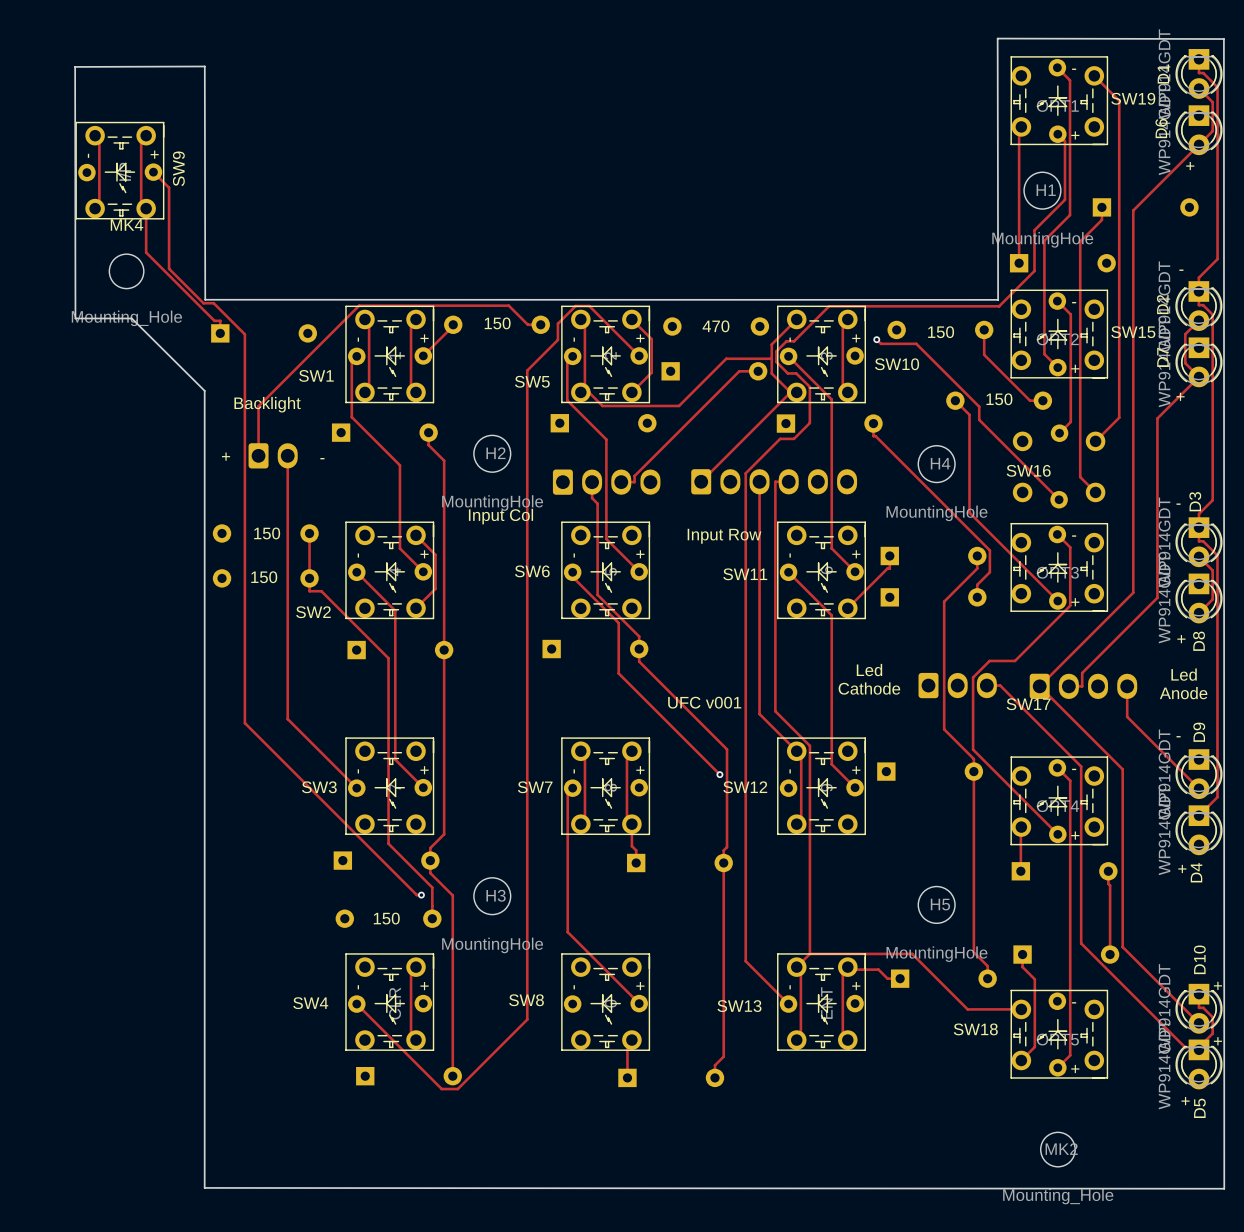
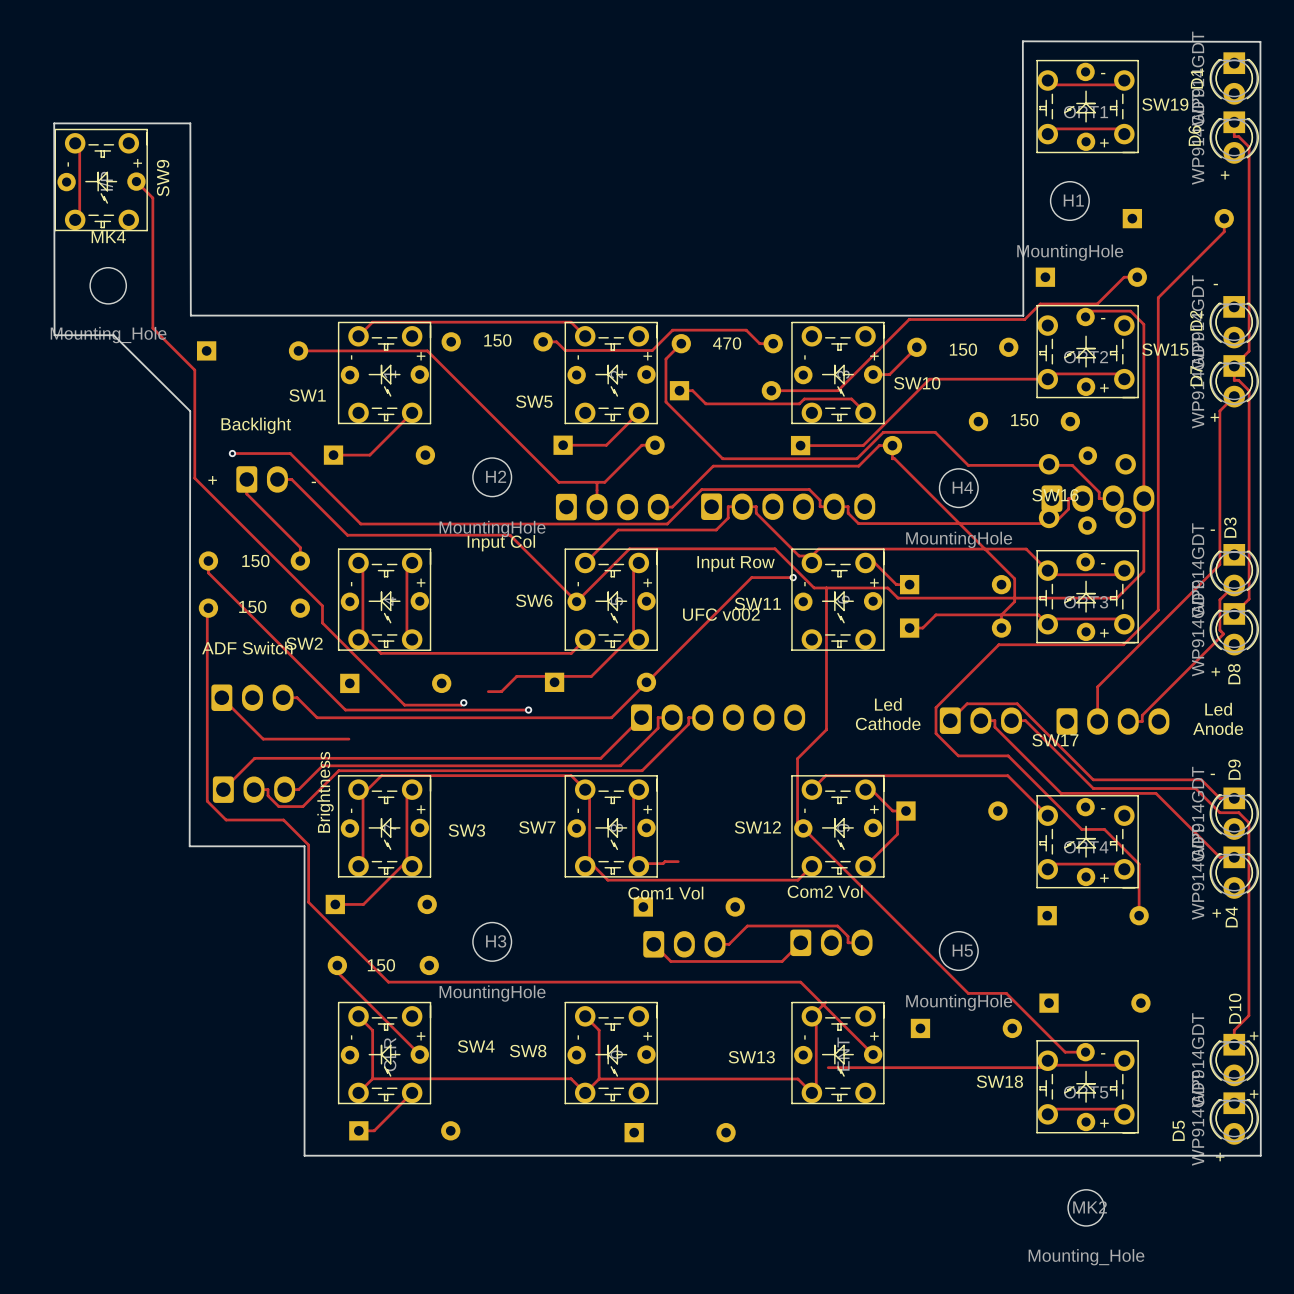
board edge: (1223, 39) (1224, 1188) (204, 1187) (204, 390) -> (1260, 41) (1260, 1155) (304, 1155) (304, 846) (189, 846) (190, 411)
track: (1198, 59) (1198, 73) (1203, 73) (1217, 87) (1217, 259) (1198, 277) (1198, 305) (1203, 305) (1212, 314) (1212, 500) (1198, 513) (1198, 541) (1203, 541) (1217, 555) (1217, 797) (1198, 815) -> (980, 720) (994, 720) (994, 727) (1061, 793) (1156, 793) (1219, 857) (1234, 857)
track: (1057, 67) (1070, 80) (1070, 215) (1044, 240) (1044, 354) (1057, 367) -> none
track: (1094, 75) (1119, 100) (1119, 417) (1095, 441) -> (1124, 80) (1119, 84) (1052, 84) (1047, 80)
track: (1198, 88) (1212, 102) (1212, 131) (1133, 210) (1133, 592) (1039, 686) (1122, 769) (1122, 947) (1198, 1023) -> none
track: none -> (1234, 122) (1234, 136) (1238, 136) (1249, 146) (1249, 351) (1234, 365) (1234, 380) (1238, 380) (1249, 390) (1249, 599) (1234, 613)
track: (1021, 126) (1019, 129) (1019, 263) -> (1047, 134) (1052, 128) (1119, 128) (1124, 134)
track: (1057, 134) (1065, 141) (1065, 199) (1034, 230) (1034, 271) (999, 306) (829, 306) (794, 341) (786, 341) (776, 351) (776, 362) (787, 373) (796, 373) (809, 386) (809, 423) (794, 438) (780, 438) (745, 473) (745, 961) (788, 1004) -> none
track: (146, 135) (141, 140) (141, 203) (146, 208) (146, 252) (214, 320) (220, 320) (220, 333) -> none
track: (1101, 207) (1101, 219) (1080, 241) (1080, 477) (1095, 492) -> none
track: (169, 268) (203, 303) (213, 303) (244, 334) (244, 723) (416, 895) (421, 895) -> (152, 283) (152, 328) (194, 370) (194, 478) (322, 605) (322, 622) (404, 705) (461, 705) (463, 702)
board edge: (205, 299) (204, 66) (75, 66) (75, 318) -> (190, 315) (190, 123) (54, 123) (54, 335)
track: (1057, 301) (1070, 314) (1070, 421) (1059, 433) -> (1085, 316) (1091, 311) (1130, 311) (1143, 324) (1143, 571) (1116, 598) (897, 598) (887, 587) (814, 587) (774, 548) (629, 548) (576, 601) (510, 535) (347, 535) (291, 479) (277, 479)
track: (364, 319) (369, 323) (369, 388) (364, 392) -> (358, 336) (372, 322) (571, 322) (585, 336)
track: (416, 319) (411, 324) (411, 387) (416, 392) -> (333, 455) (369, 455) (412, 412)
track: (580, 319) (584, 323) (584, 388) -> none
track: (631, 319) (651, 339) (651, 372) (631, 392) -> (563, 445) (606, 445) (638, 412)
track: (796, 319) (771, 344) (771, 373) (790, 392) (701, 481) -> none
track: (847, 319) (842, 324) (842, 387) -> (679, 390) (692, 390) (705, 403) (799, 403) (804, 398) (851, 398) (860, 407)
track: (1198, 320) (1185, 334) (1185, 363) (1198, 376) -> none
track: (453, 324) (423, 355) -> none
track: (540, 324) (527, 324) (508, 305) (359, 305) (258, 406) (258, 455) -> (300, 561) (300, 547) (246, 493) (246, 479)
track: none -> (543, 341) (556, 341) (565, 350) (652, 350) (672, 330) (746, 330) (759, 343) (773, 343)
track: none -> (681, 343) (665, 359) (665, 401) (722, 458) (857, 458) (883, 432) (935, 432) (968, 465) (1072, 465) (1099, 492) (1099, 498) (1113, 498)
track: none -> (916, 347) (889, 374) (873, 374)
track: (984, 329) (984, 354) (1030, 400) (1042, 400) -> none
track: none -> (298, 350) (427, 350) (558, 482) (604, 482) (641, 445) (655, 445)
track: (876, 339) (880, 343) (916, 343) (979, 406) (979, 419) (1059, 499) -> none
via: (876, 339) -> none
track: (639, 355) (589, 306) (575, 306) (557, 323) (557, 339) (527, 370) (527, 1019) (457, 1089) (441, 1089) (356, 1004) -> none
track: (356, 356) (351, 361) (351, 417) (399, 465) (399, 548) (423, 571) -> none
track: (572, 356) (567, 361) (567, 400) (606, 439) (606, 539) (639, 571) -> none
track: (788, 356) (831, 399) (831, 548) (855, 571) -> none
track: (771, 358) (726, 358) (679, 405) (602, 405) (584, 388) -> none
track: none -> (1124, 379) (1119, 373) (1053, 373) (1047, 379) (929, 379) (863, 445) (800, 445)
track: (758, 371) (739, 371) (634, 476) (634, 482) (621, 482) -> (771, 390) (838, 390) (909, 319) (1024, 319) (1040, 303) (1097, 303) (1124, 277) (1137, 277)
track: (1185, 390) (1157, 418) (1157, 597) (1082, 673) (1082, 686) (1068, 686) -> (1219, 411) (1219, 564) (1097, 686) (1097, 721)
track: (955, 400) (969, 414) (969, 512) (1057, 600) -> none
track: none -> (892, 445) (879, 445) (858, 466) (713, 466) (672, 507) (658, 507)
track: none -> (232, 453) (290, 453) (360, 524) (667, 524) (701, 489) (809, 489) (820, 500) (820, 506) (848, 506) (848, 513) (858, 523) (1054, 523) (1068, 509) (1068, 498) (1082, 498)
via: none -> (232, 453)
track: (428, 432) (428, 445) (444, 460) (444, 834) (430, 848) (430, 873) (452, 895) (452, 1076) -> none
track: (287, 455) (287, 719) (356, 788) -> none
part: none -> (1097, 498)
track: (759, 481) (759, 714) (801, 755) (801, 819) (796, 824) -> (589, 861) (607, 880) (797, 880) (811, 866)
track: (788, 481) (775, 481) (775, 711) (809, 745) (809, 953) (912, 953) (967, 1009) (1021, 1009) -> none
track: (592, 482) (592, 498) (597, 503) (597, 594) (639, 636) (639, 661) (727, 749) (727, 847) (723, 850) (723, 1056) (714, 1065) (714, 1077) -> (597, 507) (597, 482)
track: none -> (811, 556) (799, 556) (756, 513) (756, 506) (728, 506) (728, 518) (716, 530) (618, 530) (585, 562)
track: none -> (811, 556) (818, 549) (1026, 549) (1051, 574) (1120, 574) (1124, 570)
track: none -> (208, 561) (208, 572) (345, 710) (528, 710)
track: (309, 533) (309, 591) (321, 591) (388, 658) (388, 843) (432, 887) (432, 918) -> none
track: (1057, 534) (1070, 547) (1070, 605) (1015, 660) (989, 660) (973, 677) (973, 749) (1057, 834) -> none
track: none -> (358, 562) (362, 567) (362, 635)
track: (416, 535) (435, 554) (435, 588) (416, 608) -> (412, 562) (406, 568) (406, 634) (412, 639)
track: none -> (638, 562) (633, 568) (633, 634)
track: none -> (793, 577) (751, 577) (611, 717) (317, 717) (297, 697) (283, 697)
via: none -> (793, 577)
track: (889, 555) (889, 568) (887, 568) (847, 608) -> (909, 584) (896, 584) (874, 562) (865, 562)
track: (977, 555) (977, 568) (944, 601) (944, 729) (973, 759) (973, 952) (987, 966) (987, 978) -> none
track: (1198, 556) (1212, 570) (1212, 599) (1198, 613) -> (1234, 585) (1219, 599) (1219, 630) (1223, 633) (1142, 715) (1142, 721) (1128, 721)
track: none -> (826, 587) (826, 729) (797, 758) (797, 822) (968, 993) (1006, 993) (1065, 1052) (1085, 1052)
track: (356, 572) (395, 610) (395, 759) (423, 787) -> none
track: (572, 572) (572, 577) (618, 623) (618, 673) (719, 774) -> none
track: (788, 572) (831, 615) (831, 764) (855, 787) -> none
track: none -> (208, 608) (207, 801) (226, 820) (283, 820) (308, 845) (308, 902) (388, 982) (800, 982) (873, 1054)
text: none -> UFC v002 (721, 614)
track: none -> (1124, 624) (1119, 618) (1053, 618) (1047, 624) (1038, 614) (935, 614) (922, 628) (909, 628)
track: none -> (633, 634) (591, 676) (516, 676) (501, 691) (488, 691)
track: none -> (362, 635) (381, 653) (571, 653) (585, 639)
text: none -> ADF Switch (247, 648)
track: none -> (221, 697) (263, 739) (348, 739)
part: none -> (252, 697)
via: none -> (463, 702)
via: none -> (528, 710)
track: none -> (641, 717) (600, 758) (254, 758) (223, 789)
track: none -> (672, 717) (658, 717) (658, 728) (620, 765) (322, 765) (298, 789) (284, 789)
track: none -> (702, 717) (688, 717) (688, 724) (642, 770) (338, 770) (302, 806) (278, 806) (268, 795) (268, 789) (254, 789)
part: none -> (718, 717)
track: none -> (950, 720) (967, 703) (1017, 703) (1093, 779) (1201, 779) (1219, 798) (1234, 798)
track: (1127, 686) (1127, 716) (1198, 788) -> none
text: UFC v001 (704, 702) -> none
track: (1064, 750) (1081, 766) (1081, 943) (1185, 1047) (1198, 1047) -> (1093, 788) (1195, 788) (1219, 812) (1238, 812) (1248, 822) (1248, 1015) (1234, 1030) (1234, 1044)
part: none -> (254, 789)
track: none -> (412, 789) (406, 794) (406, 861)
track: none -> (585, 789) (571, 775) (381, 775) (363, 794)
track: none -> (811, 789) (825, 775) (1007, 775) (1047, 815)
track: none -> (865, 789) (871, 789) (892, 811) (906, 811)
text: none -> Brightness (325, 792)
track: none -> (363, 794) (363, 861) (358, 866)
track: (626, 756) (626, 819) (631, 824) (631, 846) (636, 850) (636, 863) -> (633, 794) (633, 858) (638, 863)
track: (1057, 767) (1070, 780) (1070, 1055) (1057, 1067) -> none
track: none -> (897, 811) (897, 834) (865, 866)
via: (719, 774) -> none
SW3 name position: SW3 (319, 787) -> SW3 (466, 830)
track: (572, 788) (567, 793) (567, 932) (639, 1003) -> none
track: none -> (406, 861) (363, 904) (335, 904)
track: none -> (678, 861) (638, 863)
track: (1021, 827) (1020, 871) -> (1047, 869) (1052, 864) (1119, 864) (1124, 869)
text: none -> Com2 Vol (825, 891)
text: none -> Com1 Vol (665, 893)
track: (1108, 871) (1110, 954) -> (1139, 915) (1139, 864) (1104, 829) (1081, 829) (1008, 755) (958, 755) (936, 733) (936, 707) (998, 644) (1123, 644) (1158, 610) (1158, 297) (1224, 231) (1224, 218)
via: (421, 895) -> none
track: none -> (800, 942) (782, 961) (670, 961) (653, 944)
part: none -> (831, 942)
track: none -> (862, 942) (848, 942) (848, 936) (837, 926) (747, 926) (729, 944) (715, 944)
part: none -> (684, 944)
track: none -> (337, 965) (337, 972) (419, 1054)
track: (1022, 954) (1022, 967) (1034, 979) (1034, 1047) (1026, 1055) -> (1124, 1114) (1119, 1109) (1052, 1109)
track: none -> (358, 1016) (372, 1030) (372, 1078)
track: (416, 967) (411, 972) (411, 1035) (416, 1040) -> (358, 1130) (374, 1130) (412, 1092)
track: none -> (585, 1016) (599, 1030) (599, 1078)
track: (847, 969) (878, 969) (887, 978) (900, 978) -> none
track: (847, 969) (842, 974) (842, 1035) (847, 1040) -> none
track: (1198, 994) (1198, 1007) (1203, 1007) (1212, 1017) (1212, 1033) (1198, 1047) -> none
SW4 name position: SW4 (310, 1003) -> SW4 (476, 1046)
track: none -> (1124, 1060) (1119, 1065) (1052, 1065) (1047, 1060) (1040, 1067) (828, 1067)
track: none -> (372, 1078) (358, 1092)
track: none -> (372, 1078) (571, 1078) (585, 1092) (599, 1078)
track: none -> (599, 1078) (797, 1078) (811, 1092)
track: (631, 1040) (627, 1044) (627, 1077) -> none
D5 name position: D5 (1199, 1108) -> D5 (1178, 1130)

